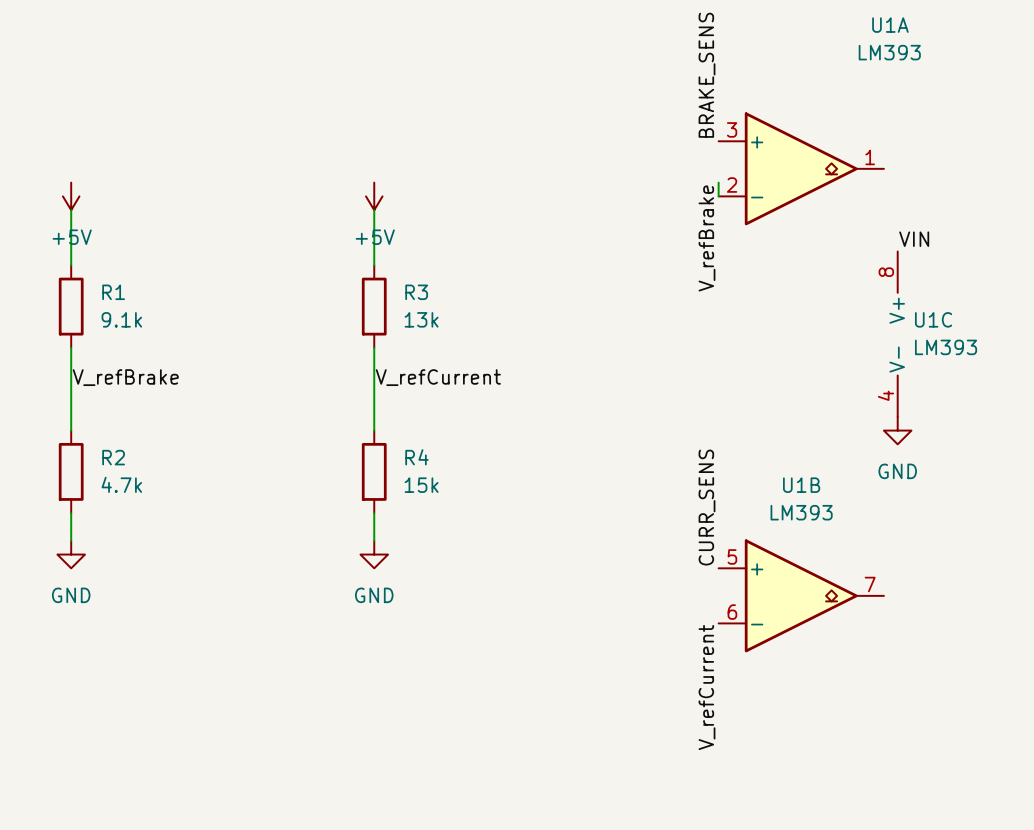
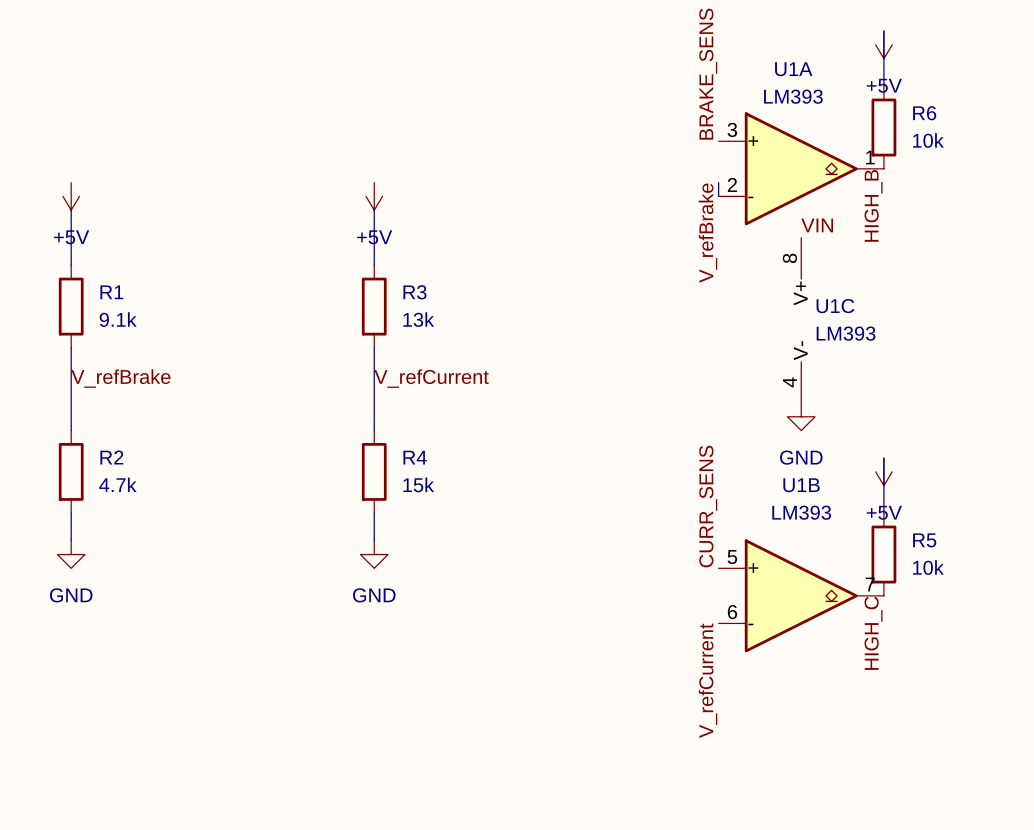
U1A name position: U1A (890, 25) -> U1A (793, 69)
wire: none -> (883, 31) (883, 86)
power symbol: none -> +5V (883, 44)
U1A value position: LM393 (889, 52) -> LM393 (793, 96)
R6: none -> 10k (883, 127)
label: none -> HIGH_B (873, 205)
label position: VIN (914, 239) -> VIN (817, 225)
U1C position: (897, 334) -> (801, 320)
power symbol position: GND (897, 430) -> GND (801, 416)
wire: none -> (883, 458) (883, 513)
power symbol: none -> +5V (883, 471)
R5: none -> 10k (883, 554)
label: none -> HIGH_C (873, 633)

